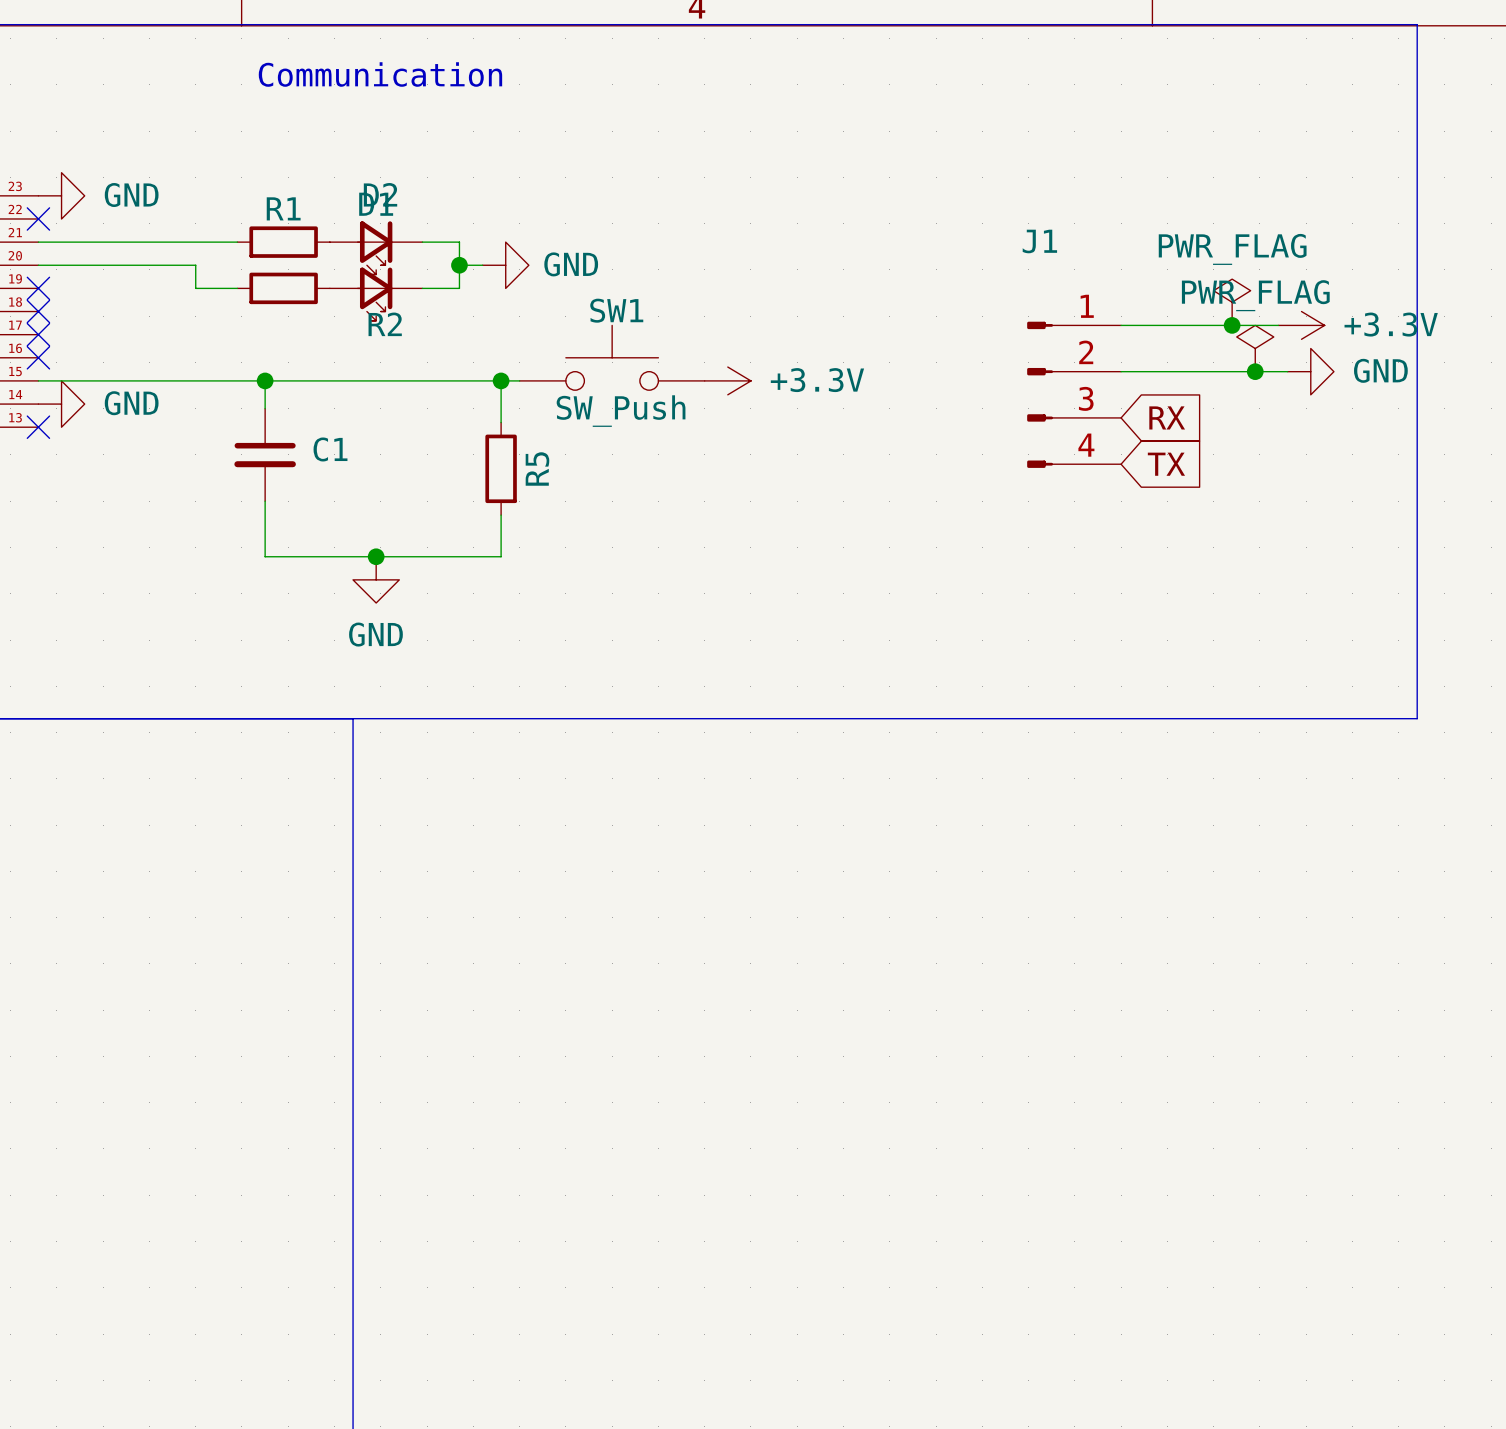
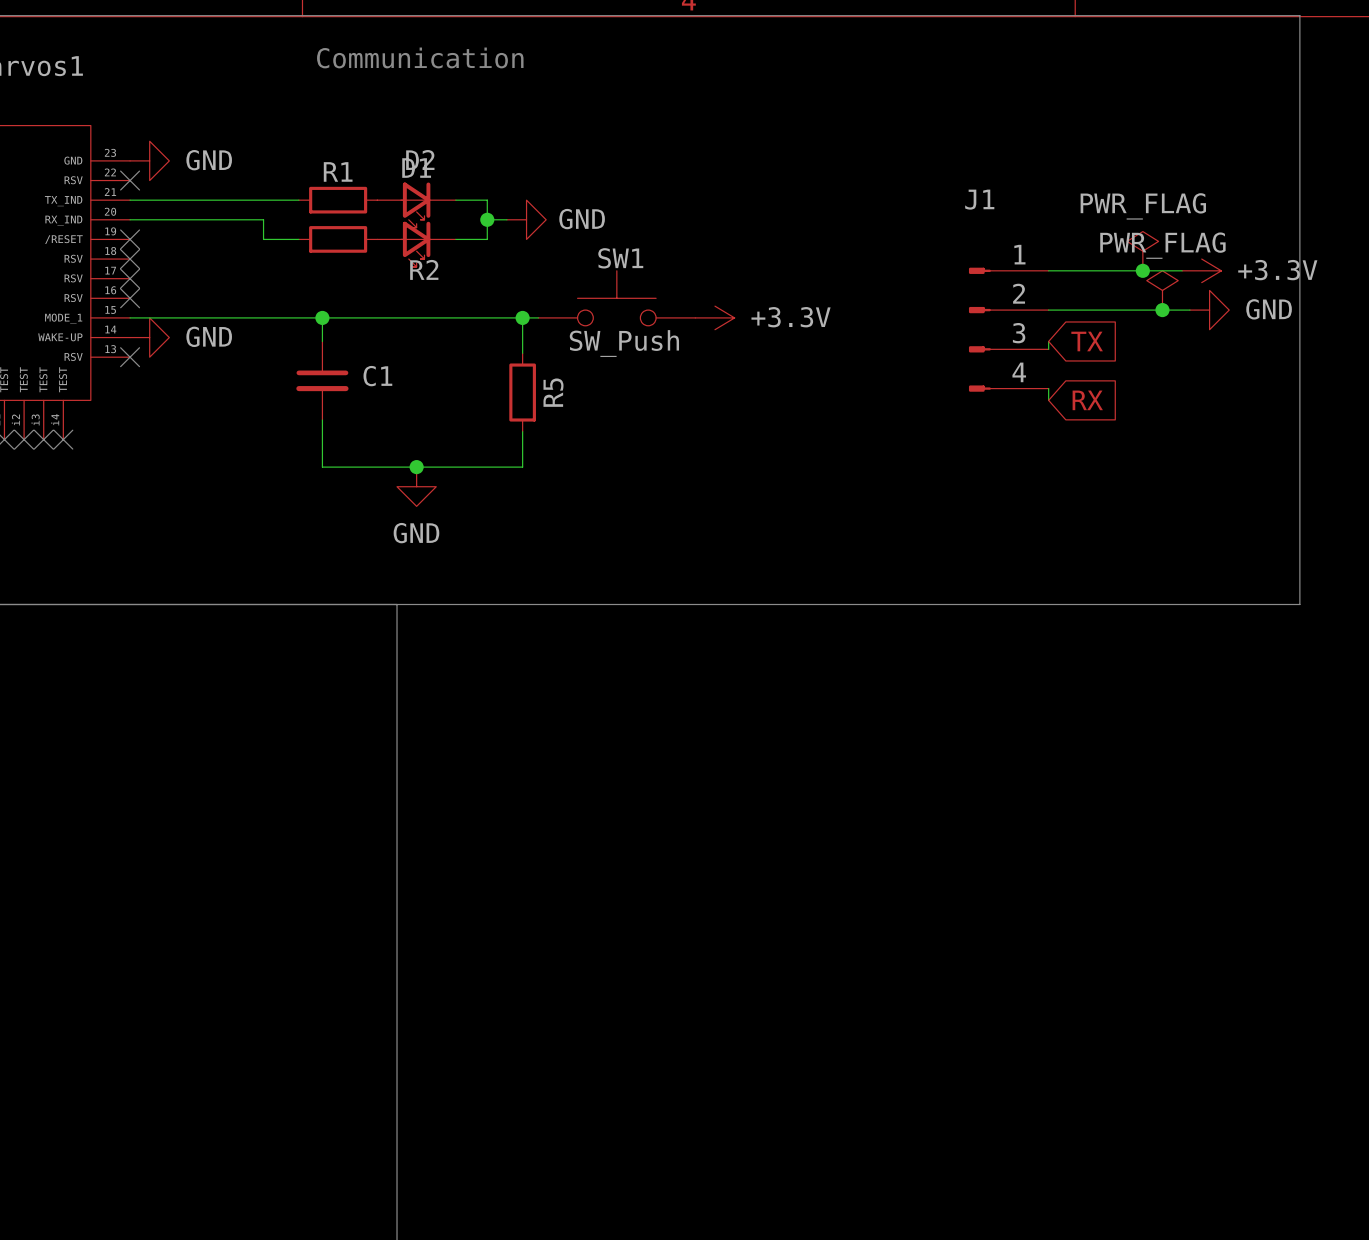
wire: none -> (1048, 341) (1048, 349)
global label position: RX (1167, 417) -> RX (1087, 400)
wire: none -> (1048, 388) (1048, 400)
global label position: TX (1166, 464) -> TX (1087, 341)

